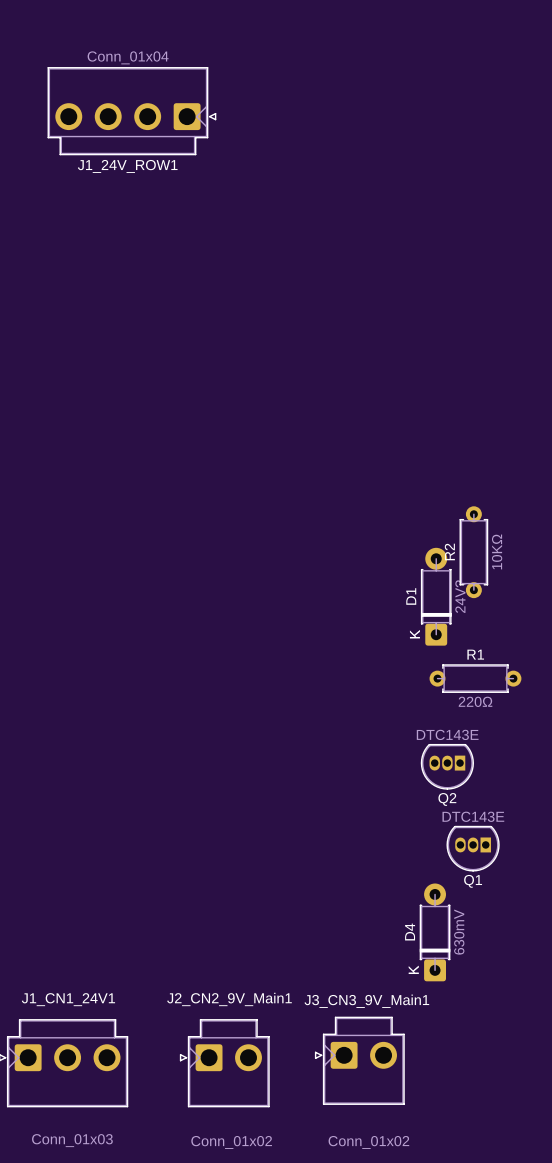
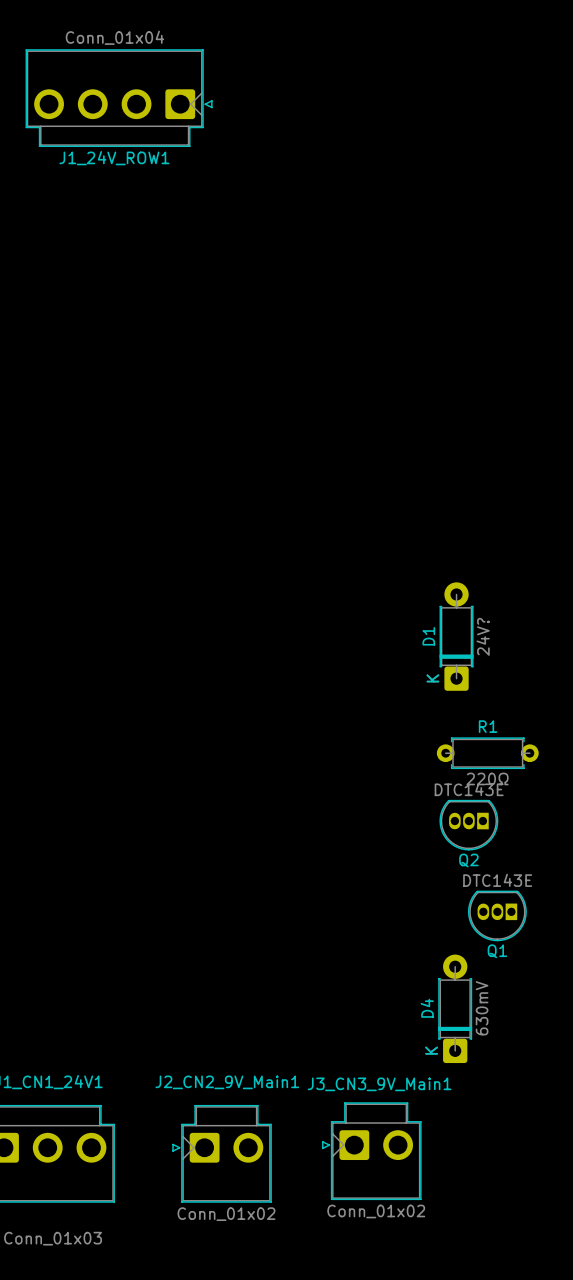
R2: 10KΩ (473, 552) -> none
R1 position: (475, 678) -> (487, 753)
J2_CN2_9V_Main1 value position: Conn_01x02 (231, 1142) -> Conn_01x02 (226, 1214)
J3_CN3_9V_Main1 value position: Conn_01x02 (368, 1142) -> Conn_01x02 (376, 1211)

